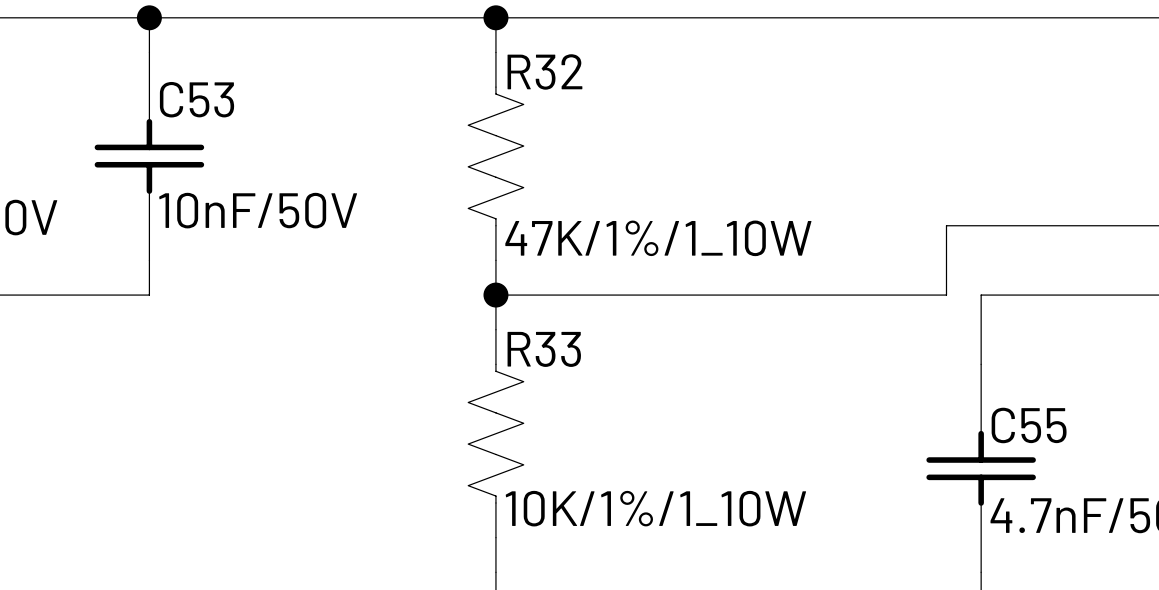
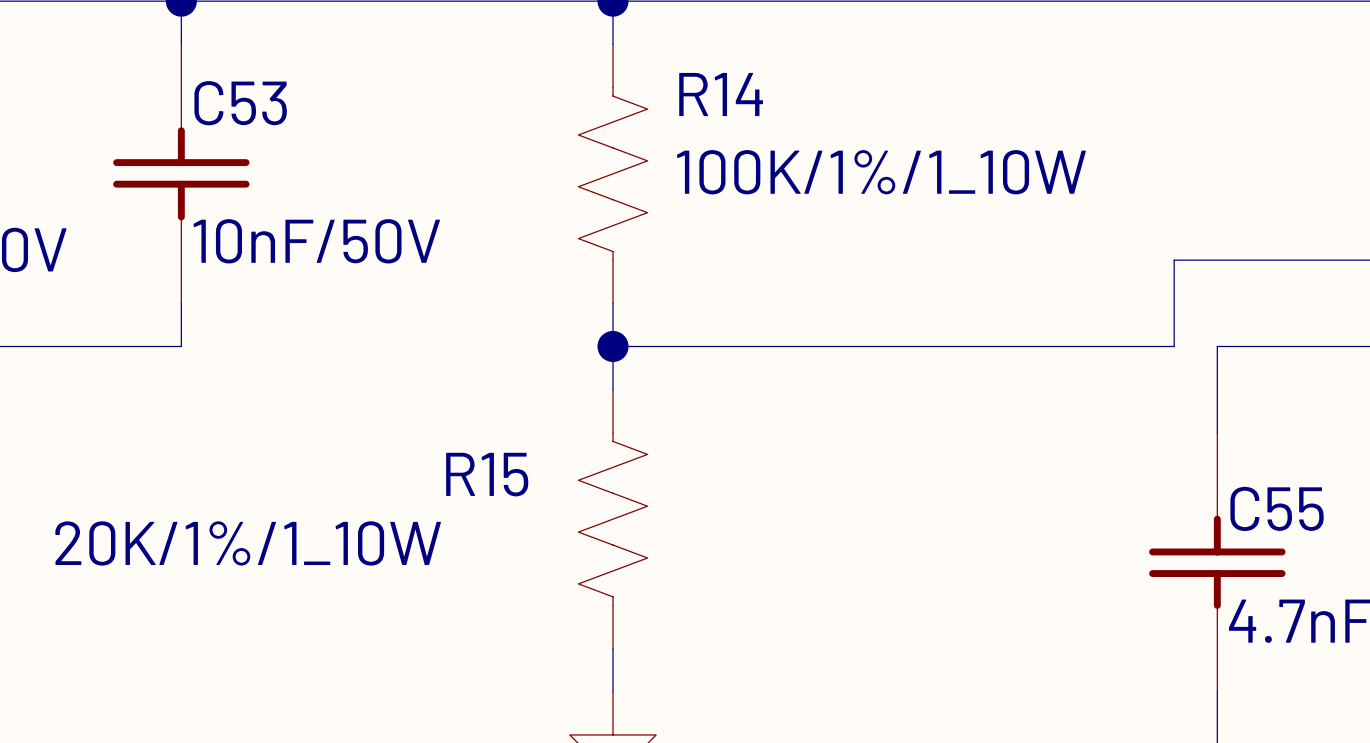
R32 name: R32 (544, 71) -> R14 (721, 94)
R32 value: 47K/1%/1_10W (658, 238) -> 100K/1%/1_10W (881, 172)
R33 name: R33 (544, 349) -> R15 (487, 474)
R33 value: 10K/1%/1_10W (655, 508) -> 20K/1%/1_10W (248, 543)

